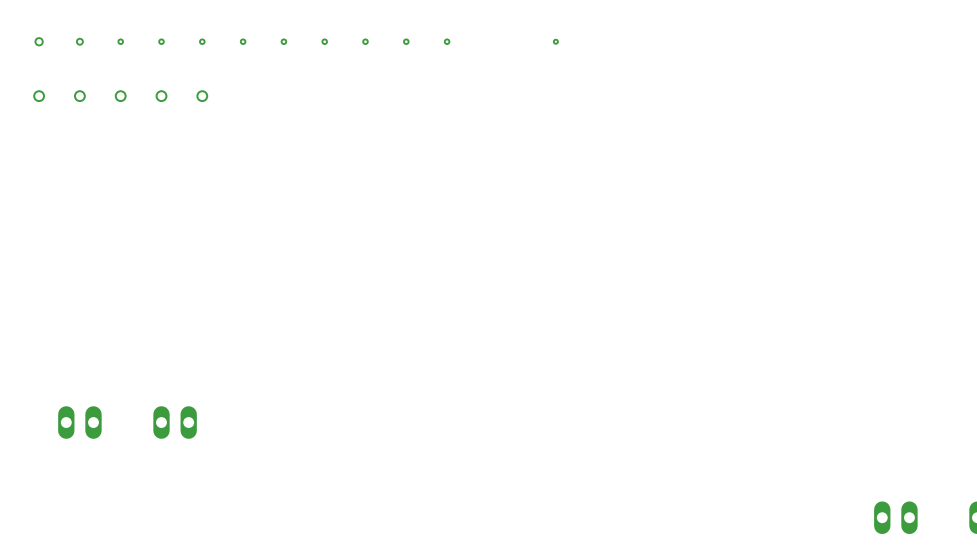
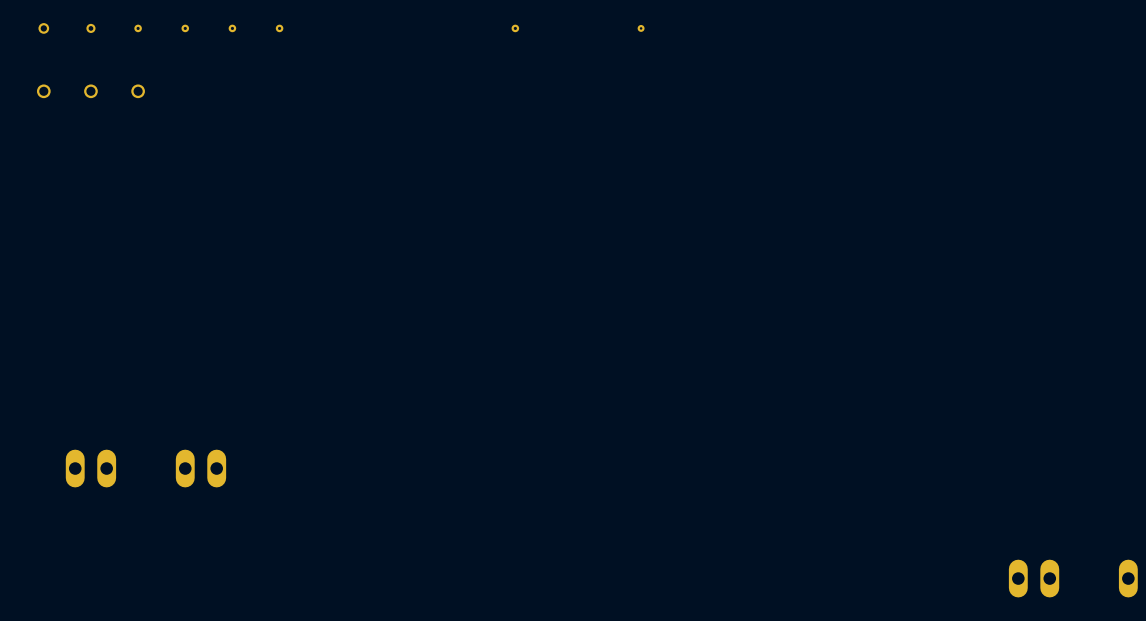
part: (283, 41) -> none
part: (324, 41) -> none
part: (365, 41) -> none
part: (406, 41) -> none
part: (161, 96) -> none
part: (202, 96) -> none

